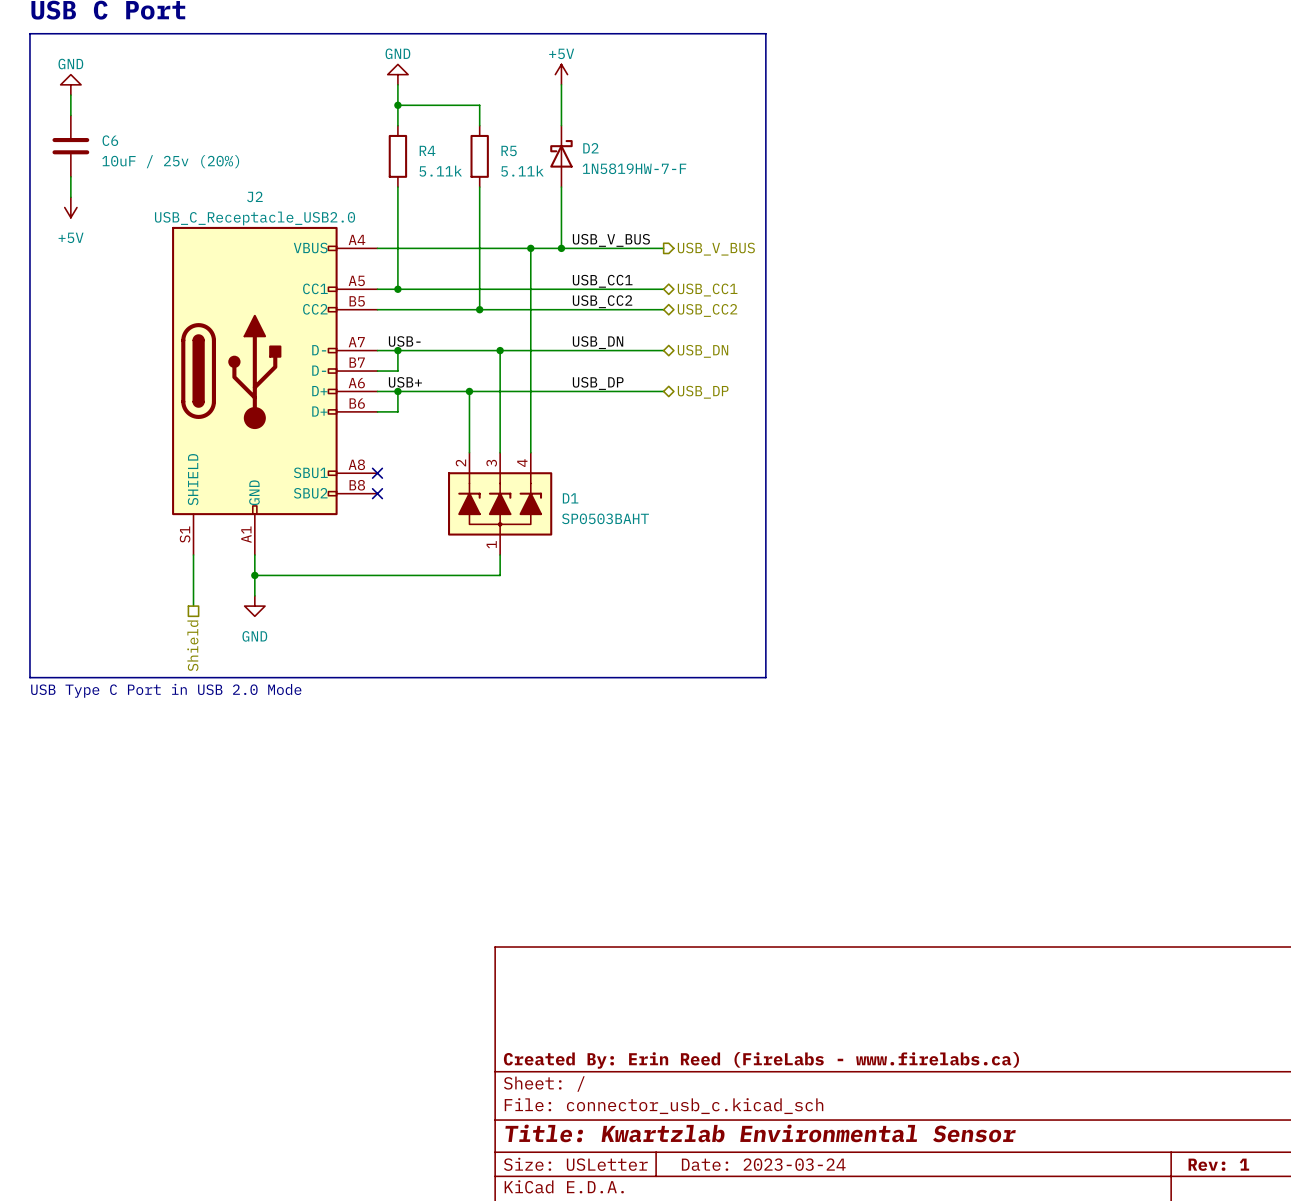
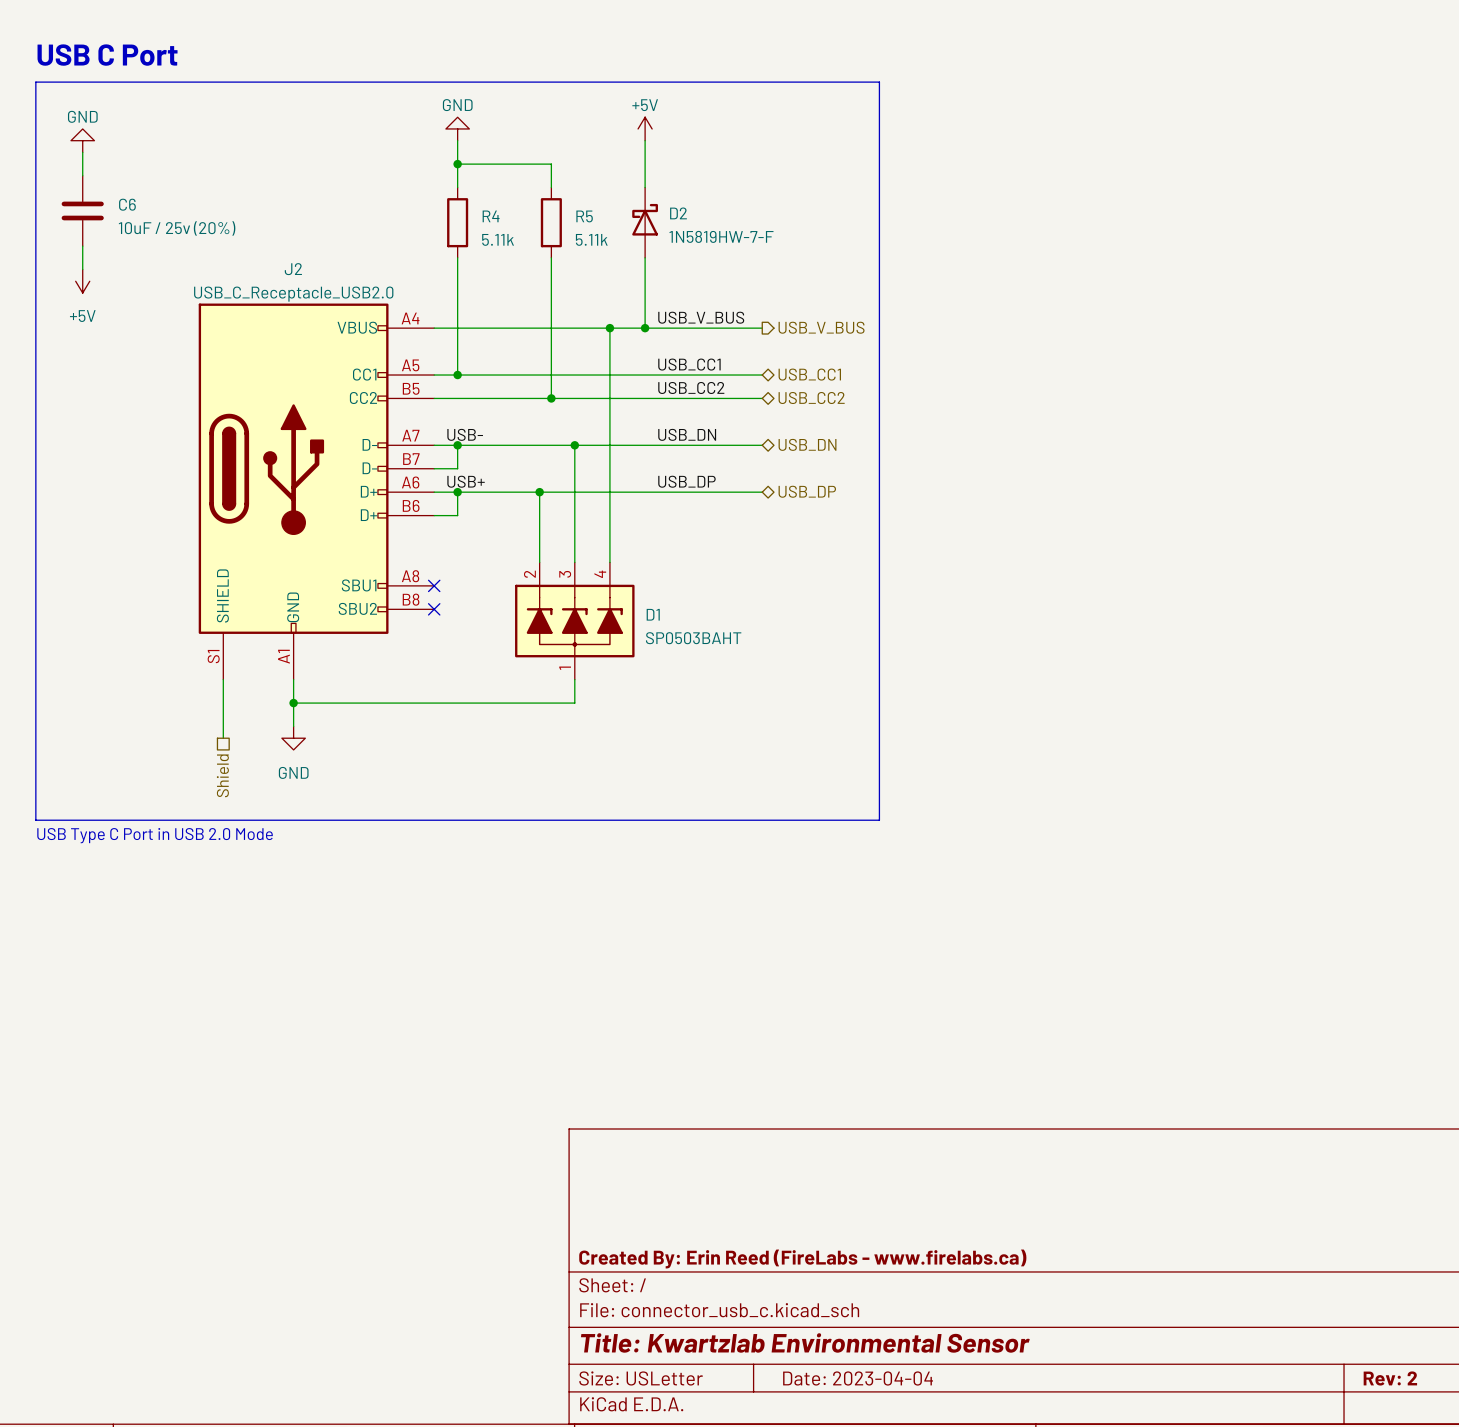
title block: Date: 2023-03-24 (763, 1164) -> Date: 2023-04-04 (858, 1378)
title block: Rev: 1 (1218, 1164) -> Rev: 2 (1390, 1378)

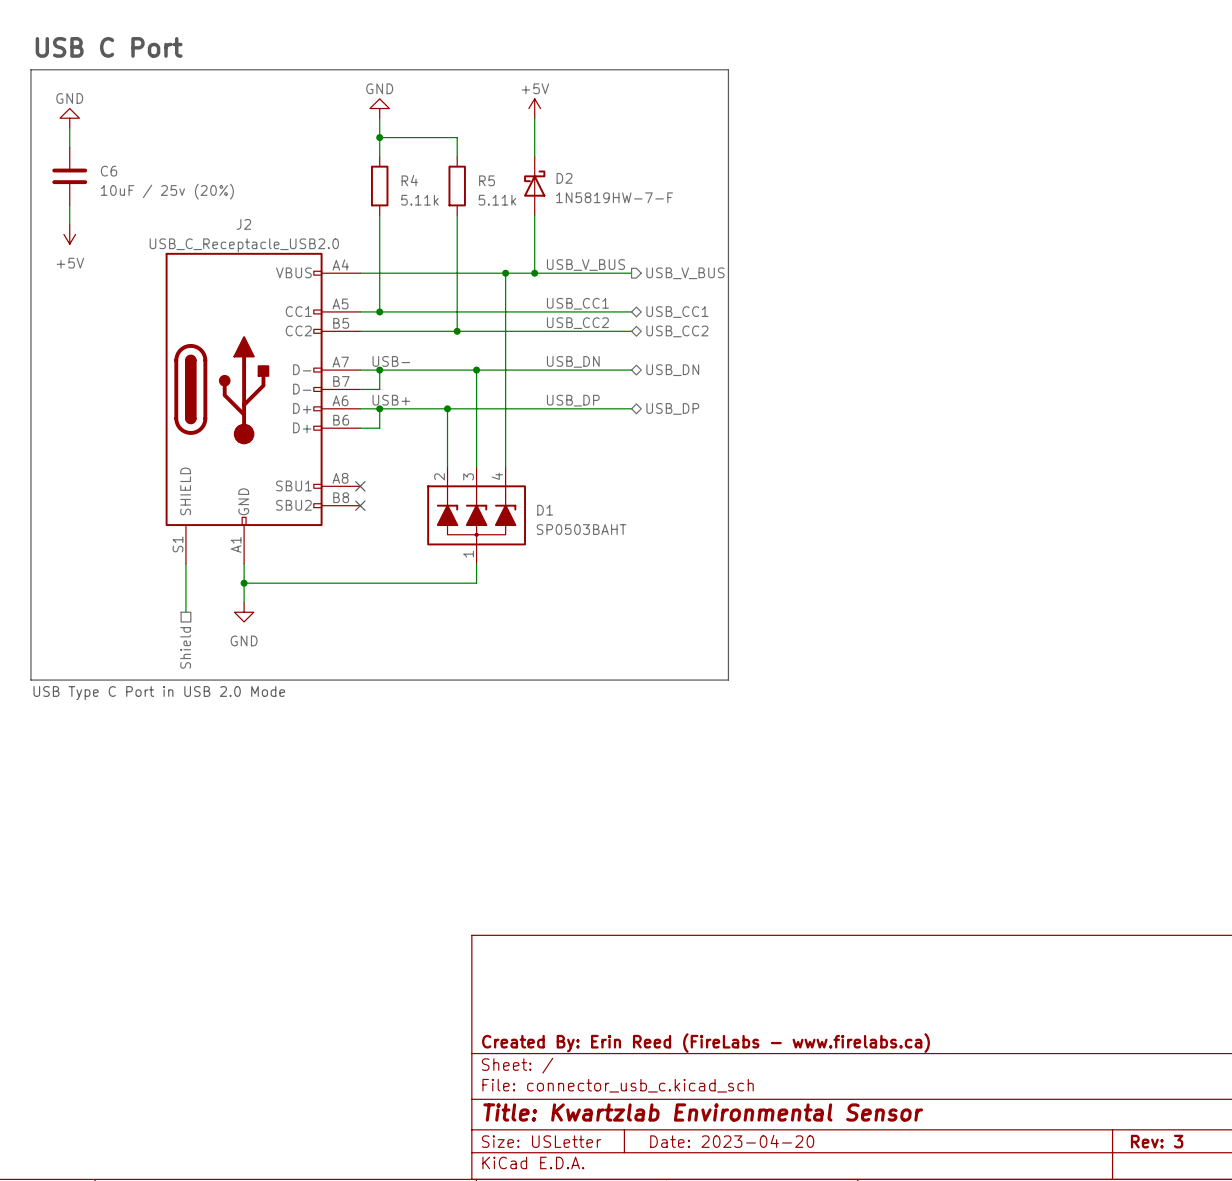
title block: Date: 2023-04-04 (858, 1378) -> Date: 2023-04-20 (732, 1141)
title block: Rev: 2 (1390, 1378) -> Rev: 3 (1157, 1141)

